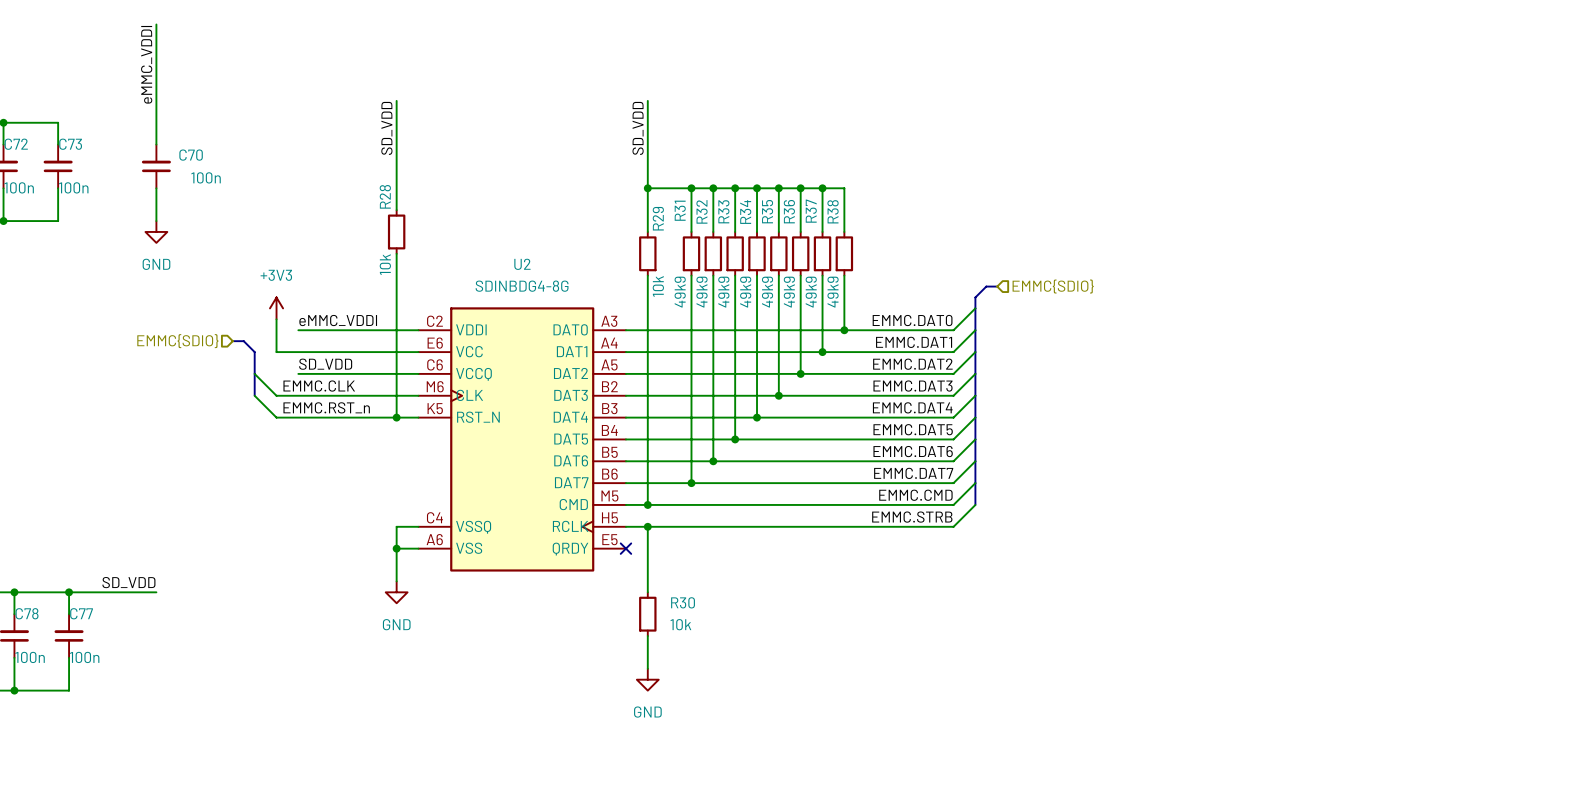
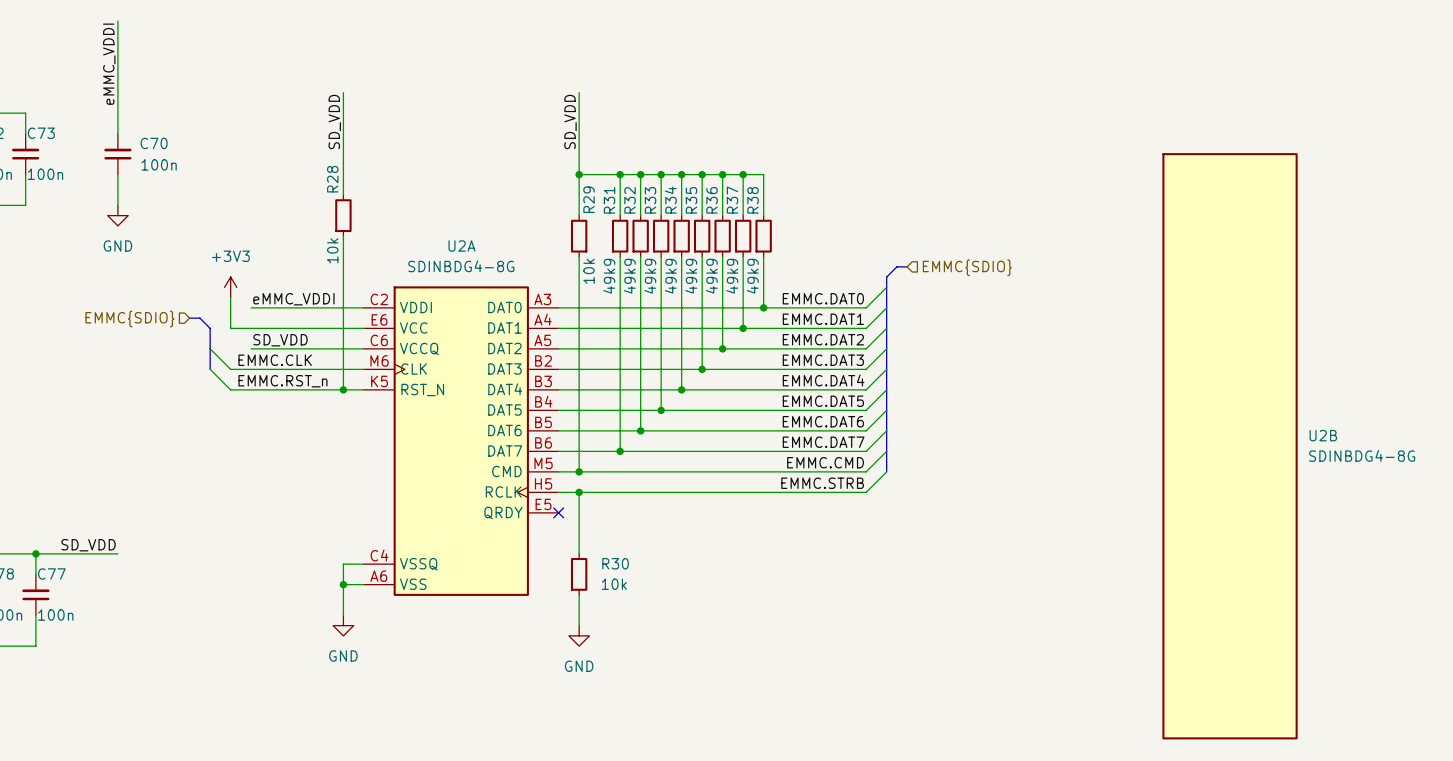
U2: (522, 439) -> none
U2A: none -> (461, 441)
U2B: none -> (1230, 446)
wire: (418, 526) (396, 526) (396, 581) -> (363, 564) (343, 564) (343, 615)
wire: (396, 548) (418, 548) -> (343, 584) (363, 584)
junction: (396, 548) -> none
power symbol position: GND (396, 592) -> GND (343, 625)
junction: none -> (343, 584)

